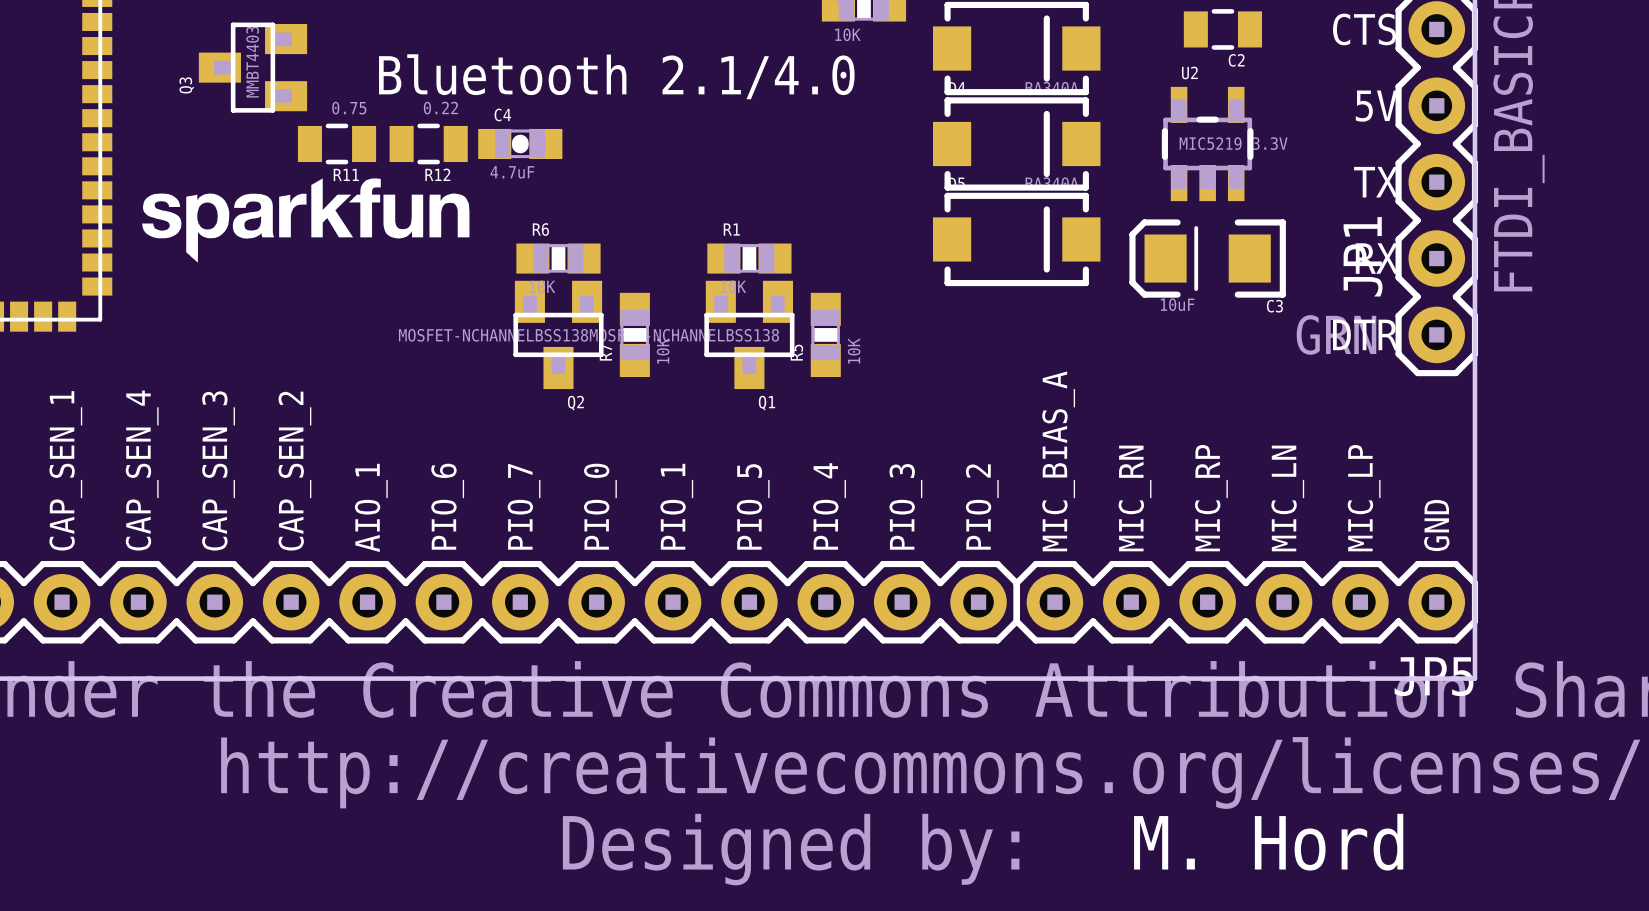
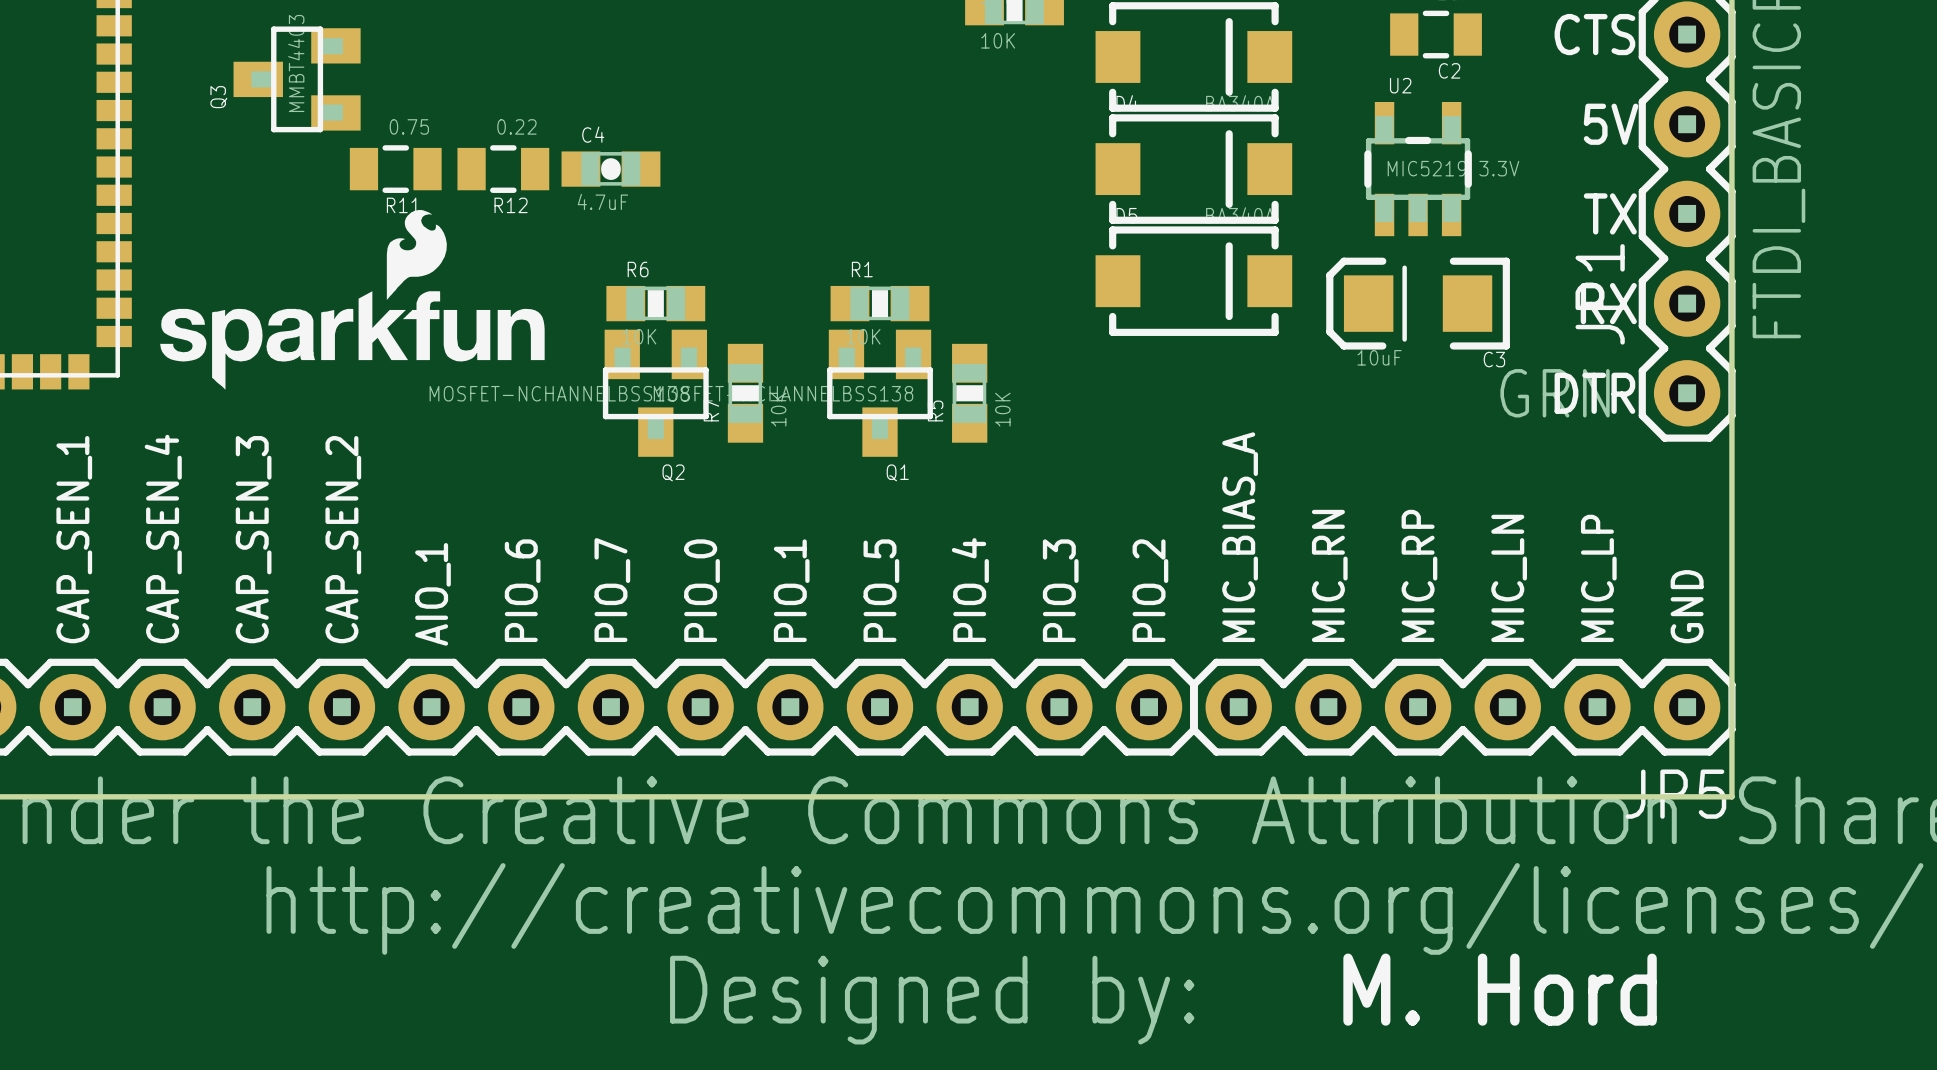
text: Bluetooth 2.1/4.0 (616, 76) -> none
drawing: none -> [160, 210, 545, 390]
drawing: [142, 178, 470, 263] -> none

